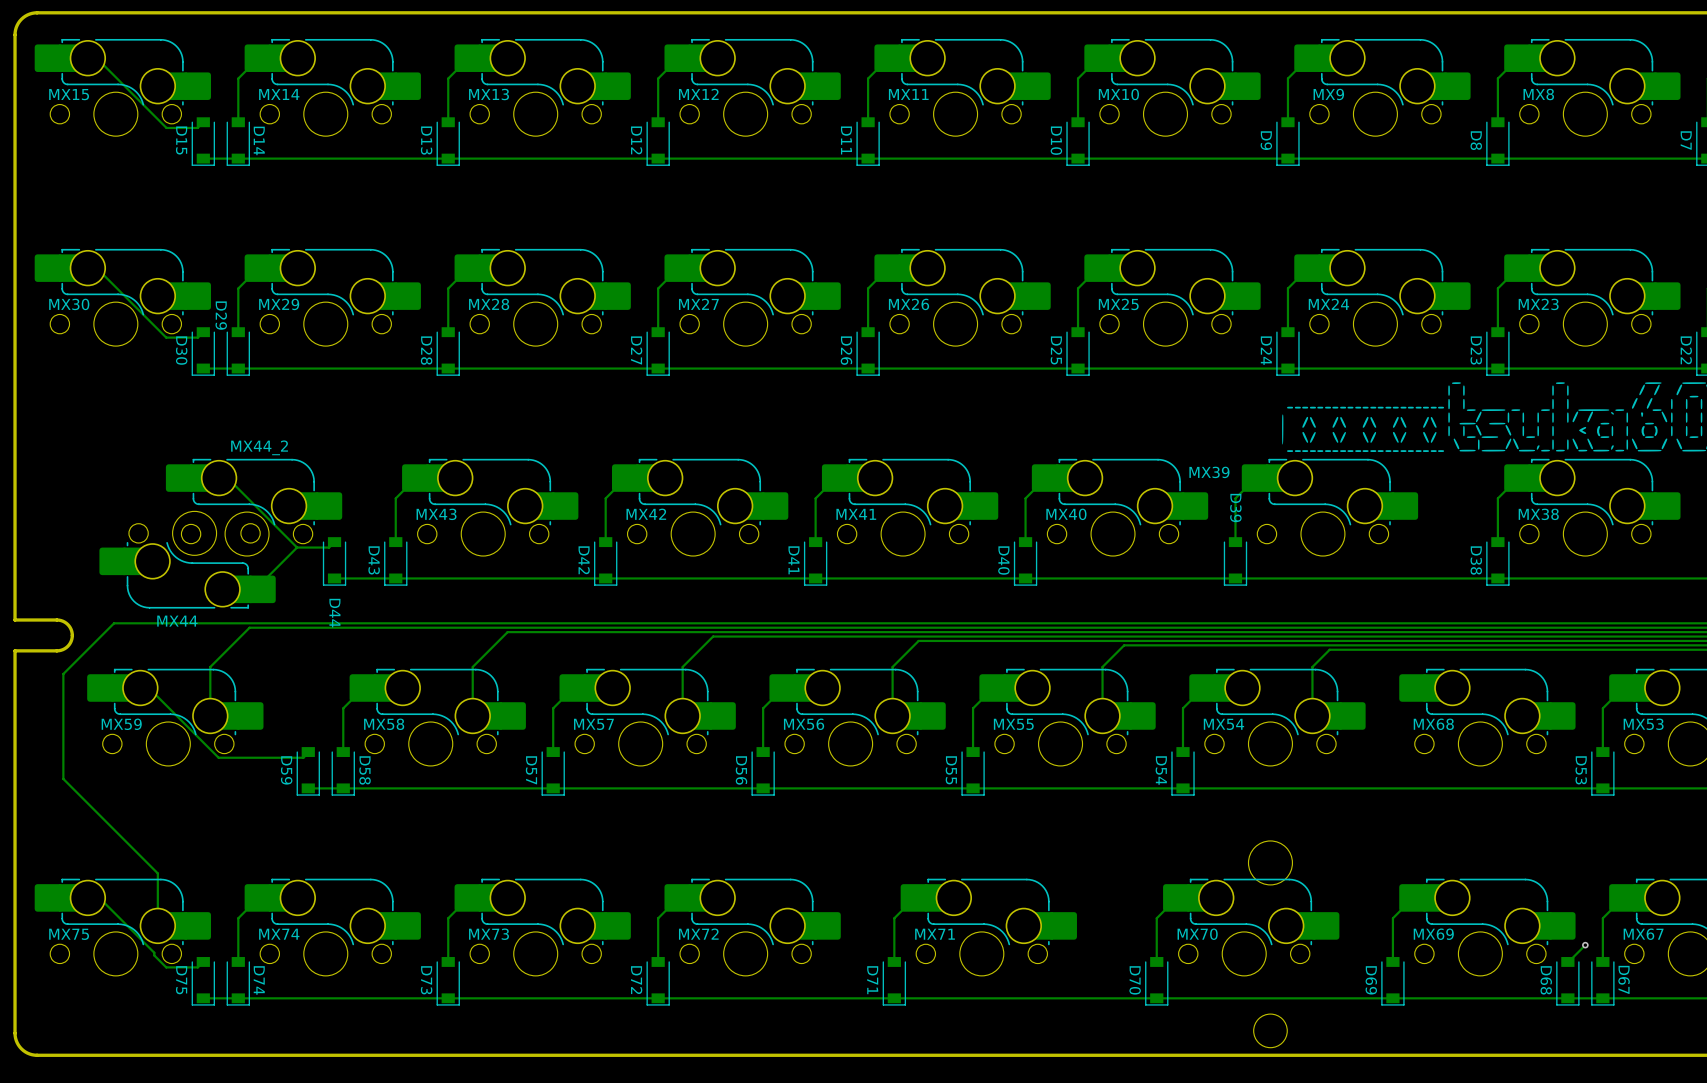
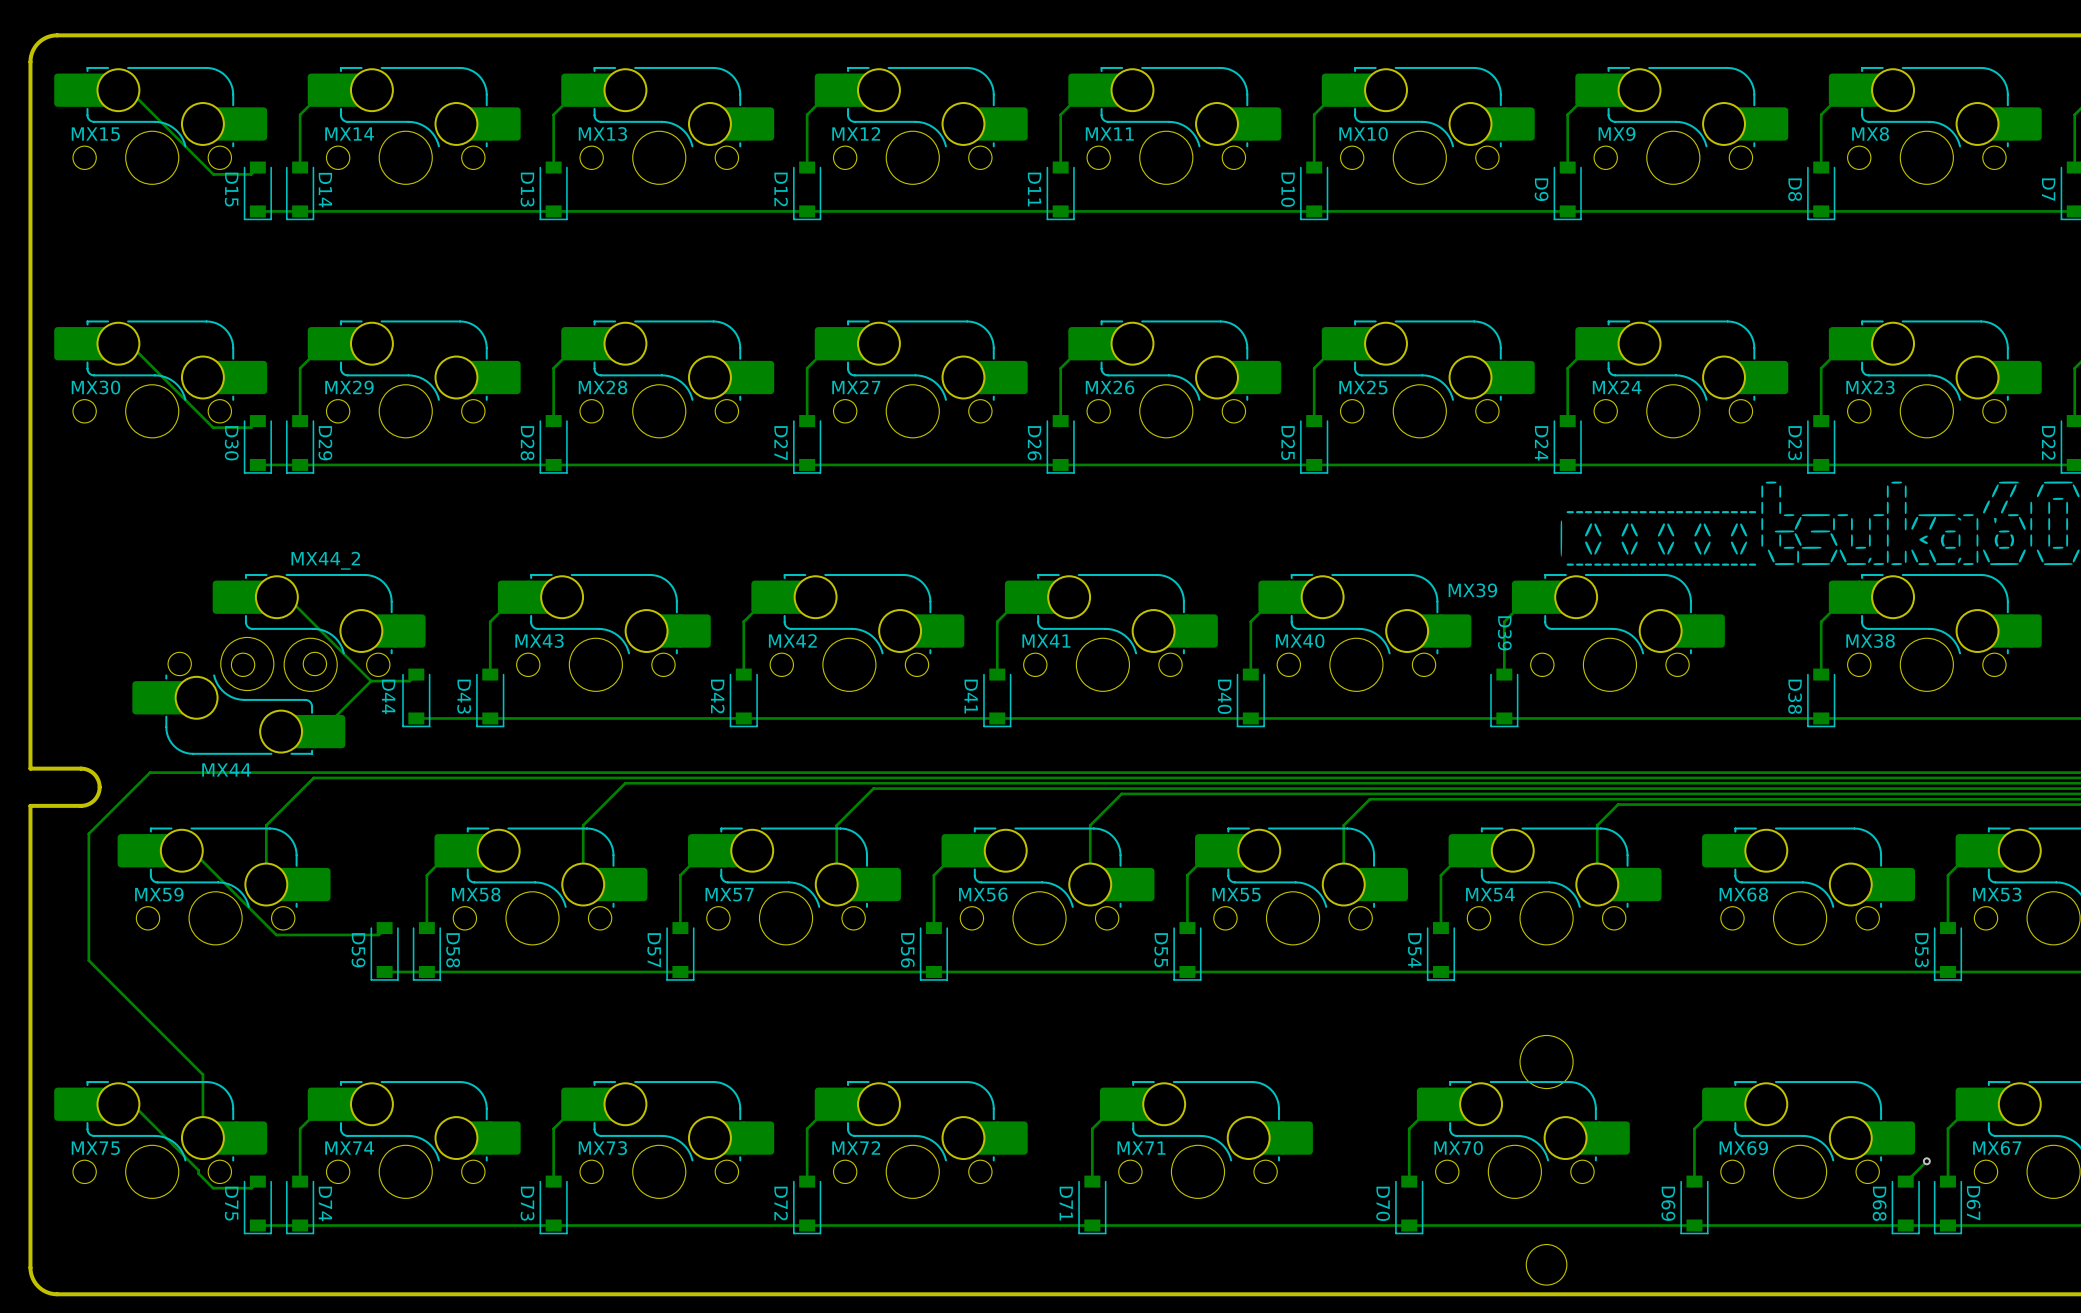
D29 name position: D29 (221, 315) -> D29 (325, 443)
D44 name position: D44 (334, 613) -> D44 (388, 696)

